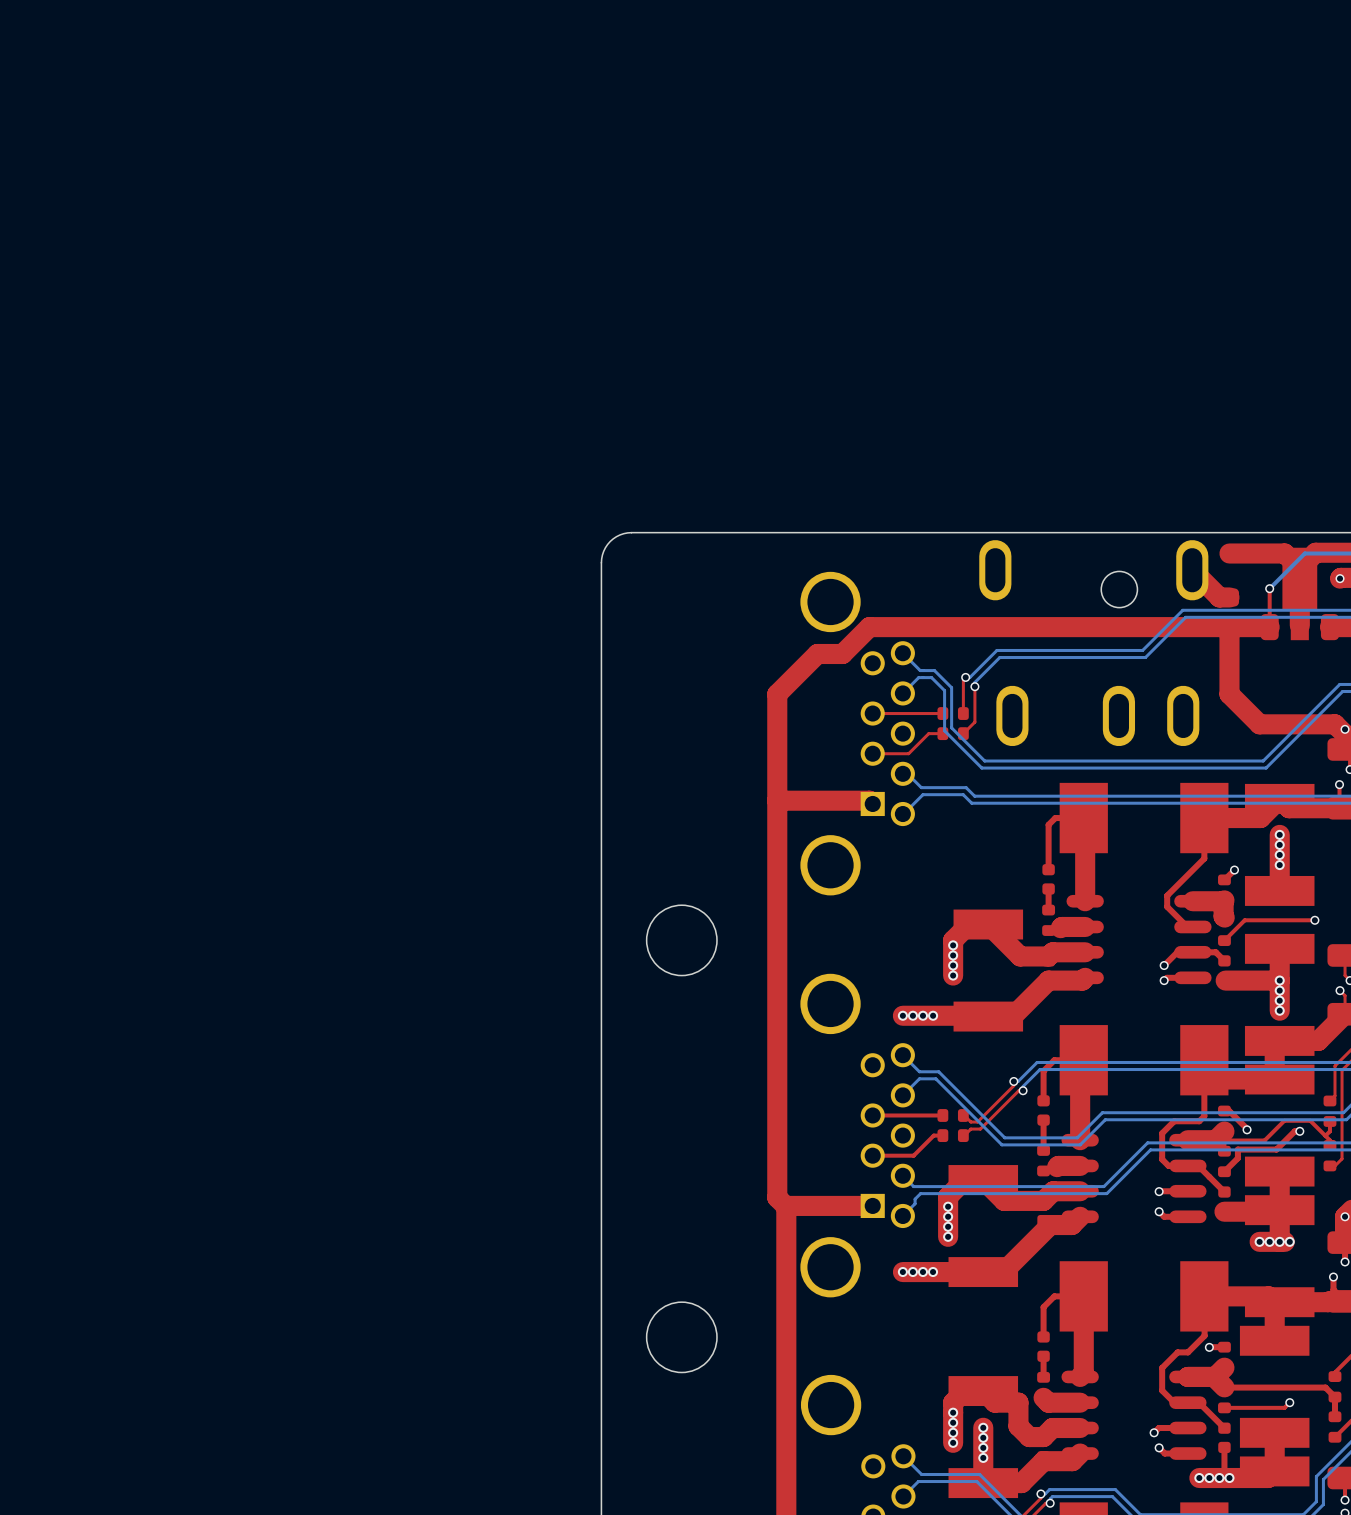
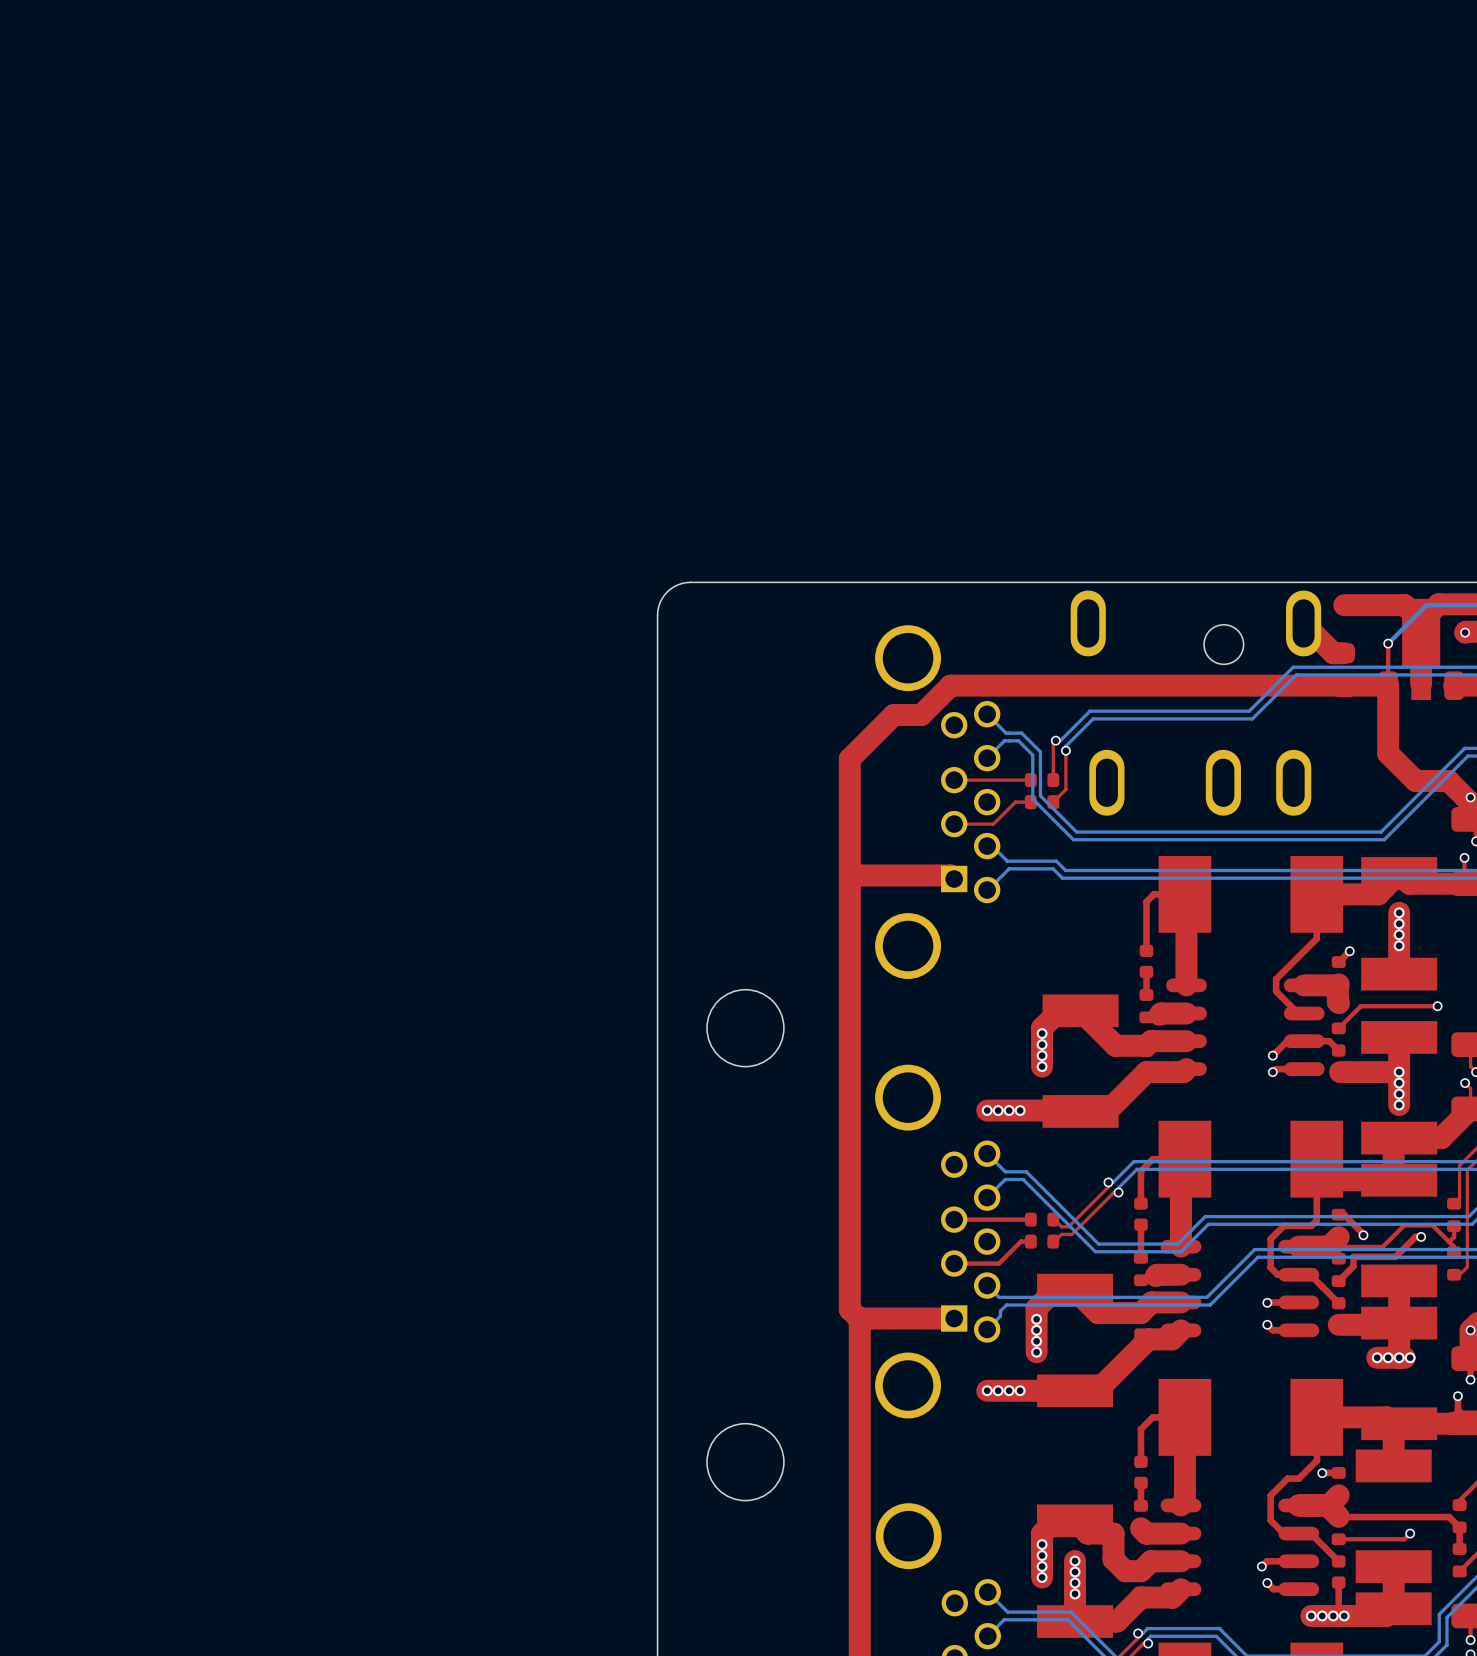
top track: (1229, 628) (1229, 694) (1259, 724) (1334, 724) -> (1388, 685) (1388, 753) (1415, 780) (1448, 780) (1459, 791)

